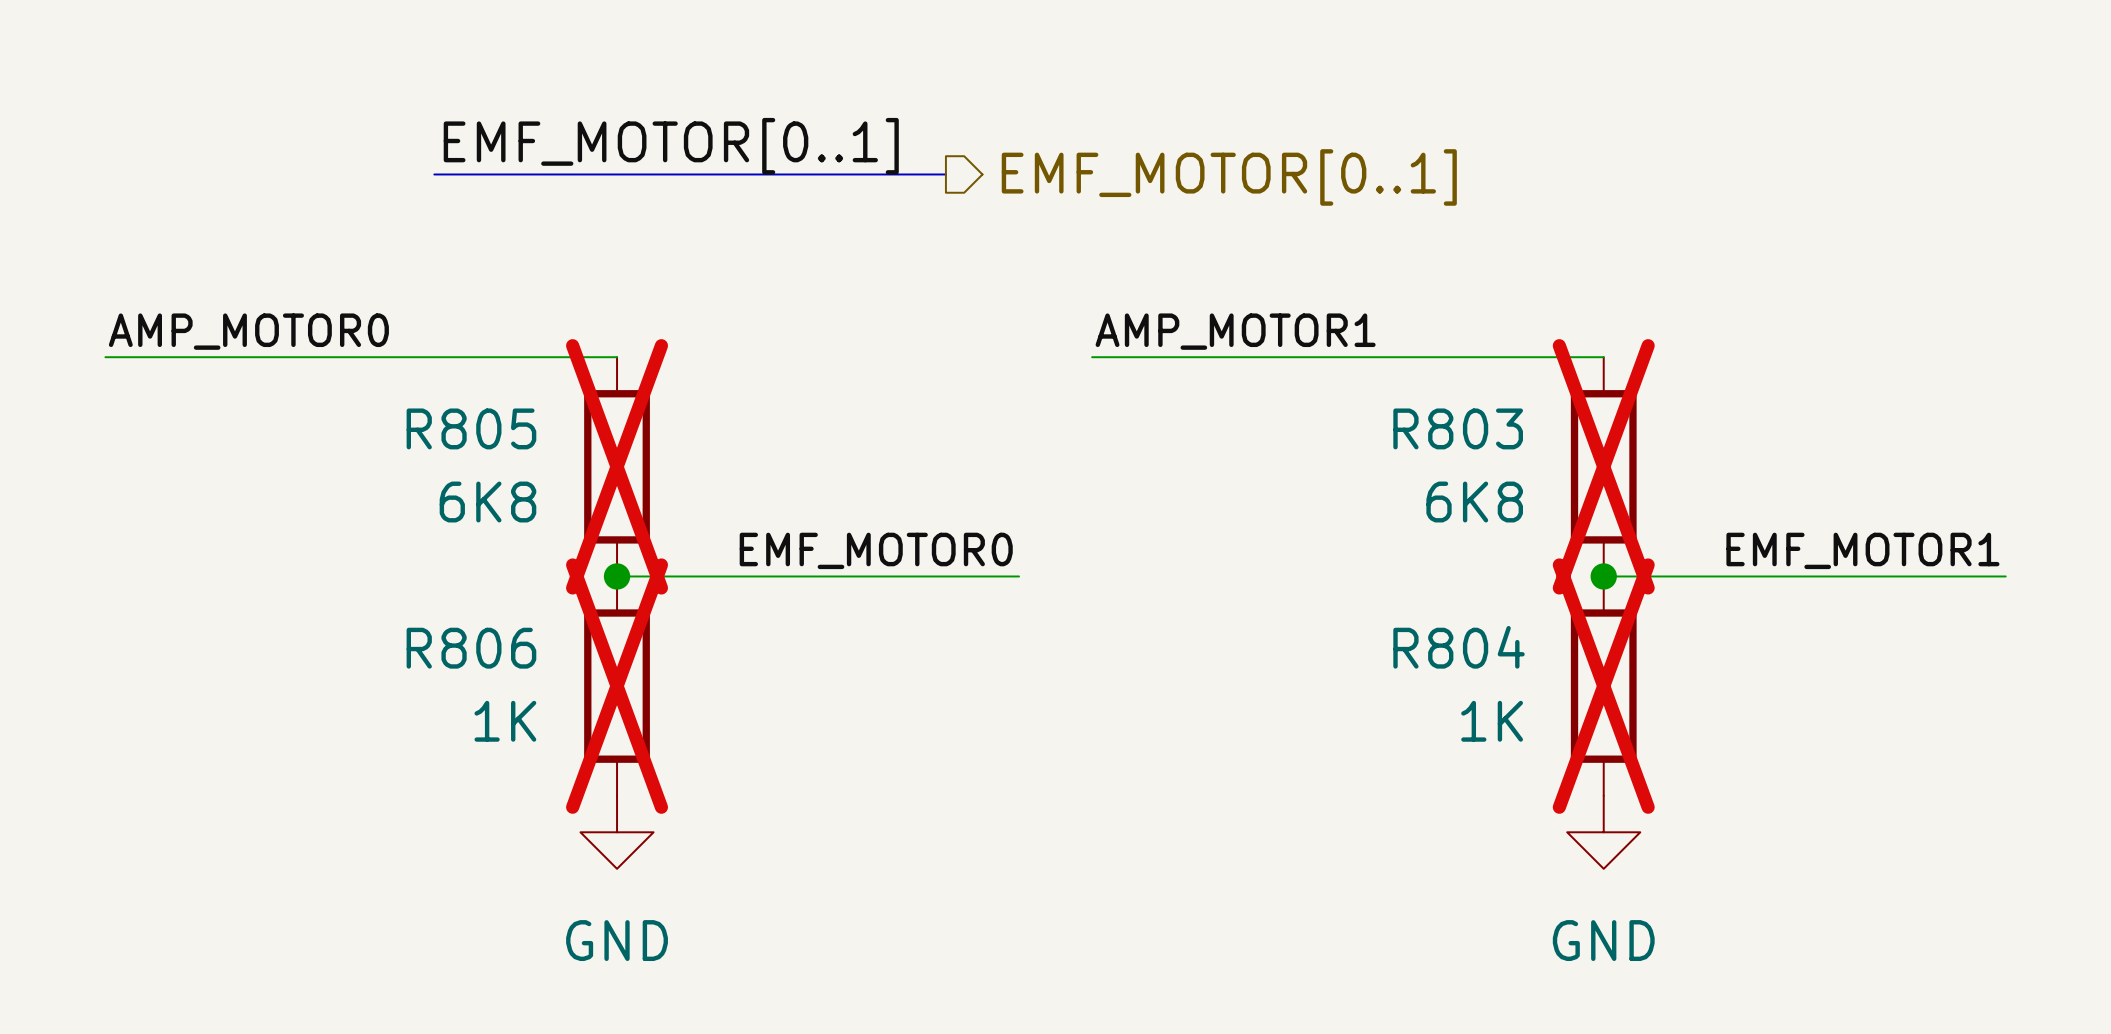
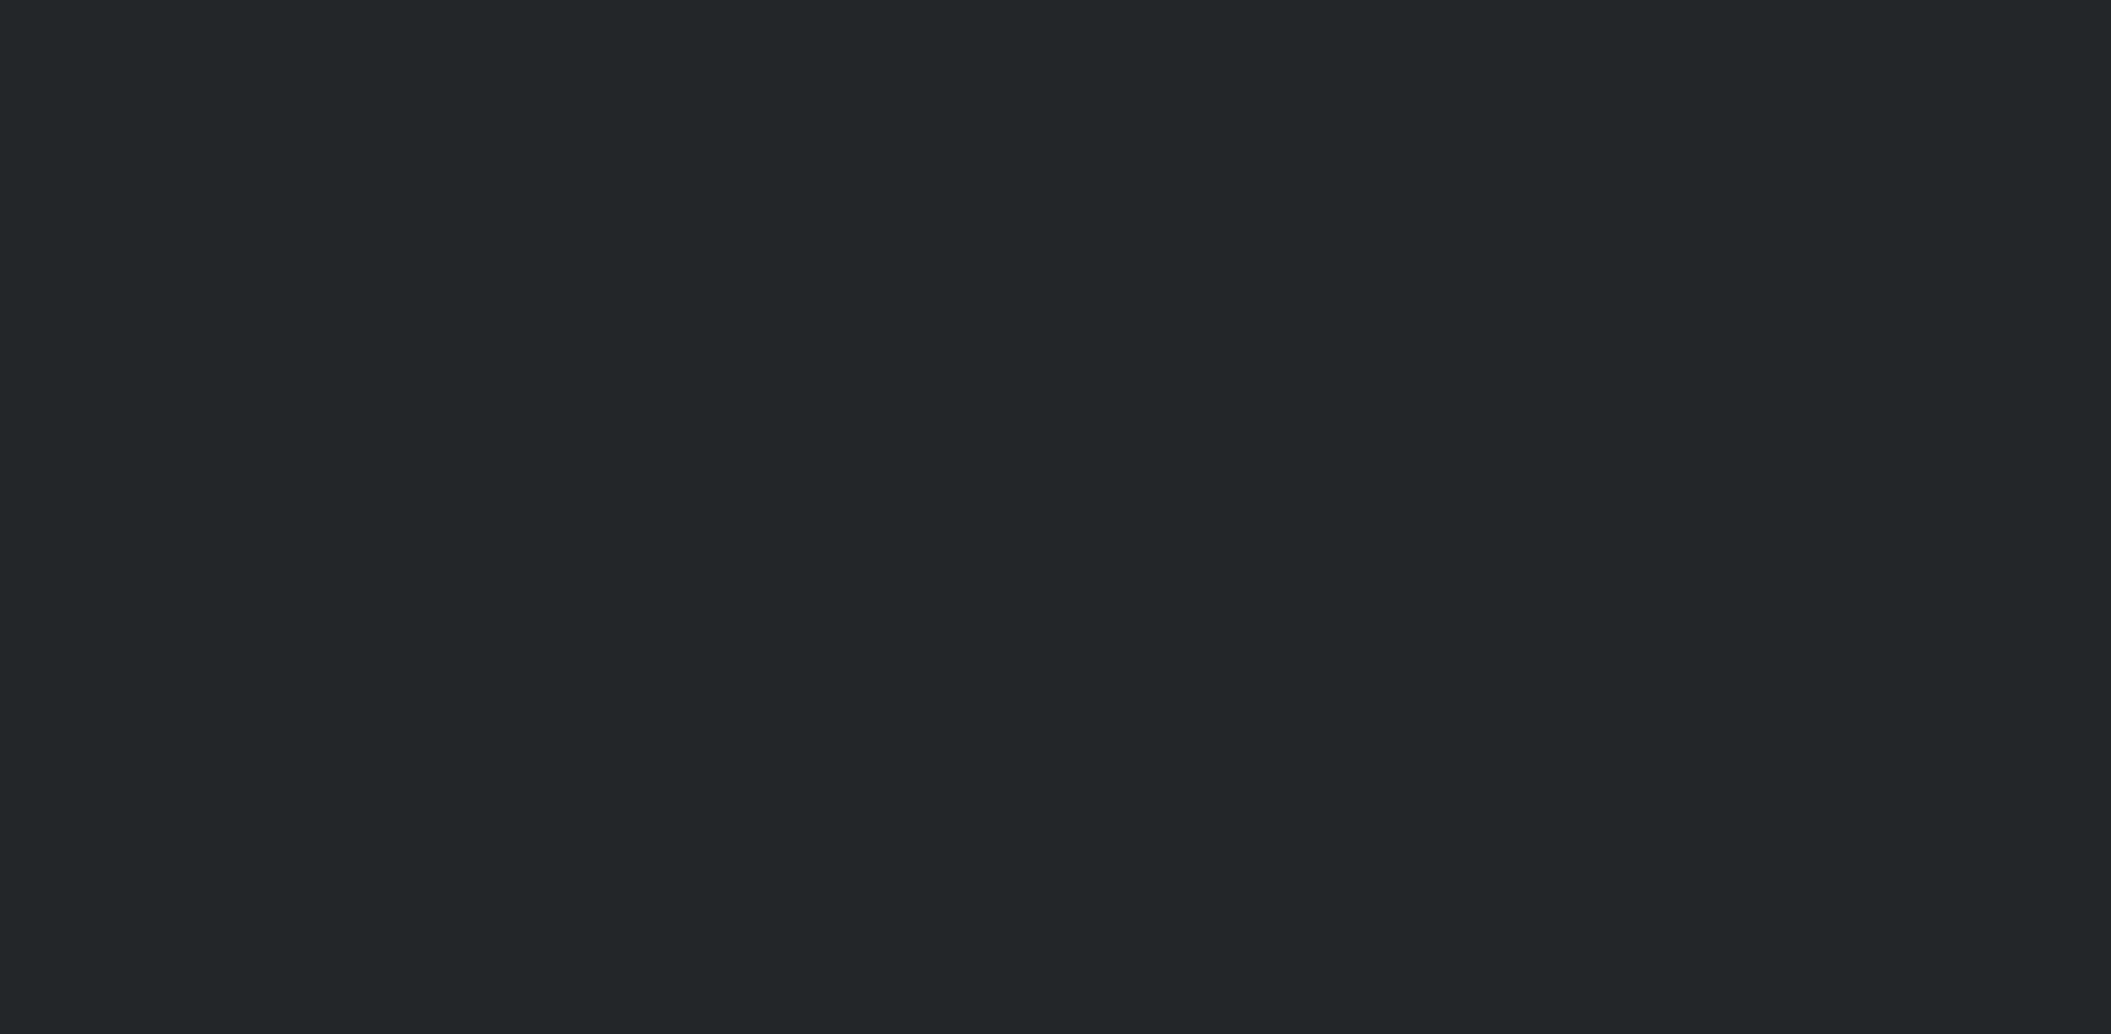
label: EMF_MOTOR[0..1] (671, 146) -> none
bus: (434, 174) (945, 174) -> none
hierarchical label: EMF_MOTOR[0..1] (1229, 177) -> none
label: AMP_MOTOR0 (248, 331) -> none
label: AMP_MOTOR1 (1235, 331) -> none
wire: (105, 357) (617, 357) -> none
wire: (1092, 357) (1603, 357) -> none
R805: 6K8 (617, 466) -> none
R803: 6K8 (1603, 466) -> none
label: EMF_MOTOR0 (876, 550) -> none
label: EMF_MOTOR1 (1862, 550) -> none
wire: (617, 576) (1019, 576) -> none
junction: (617, 576) -> none
wire: (1603, 576) (2005, 576) -> none
junction: (1603, 576) -> none
R806: 1K (617, 686) -> none
R804: 1K (1603, 686) -> none
power symbol: GND (617, 832) -> none
power symbol: GND (1603, 832) -> none

